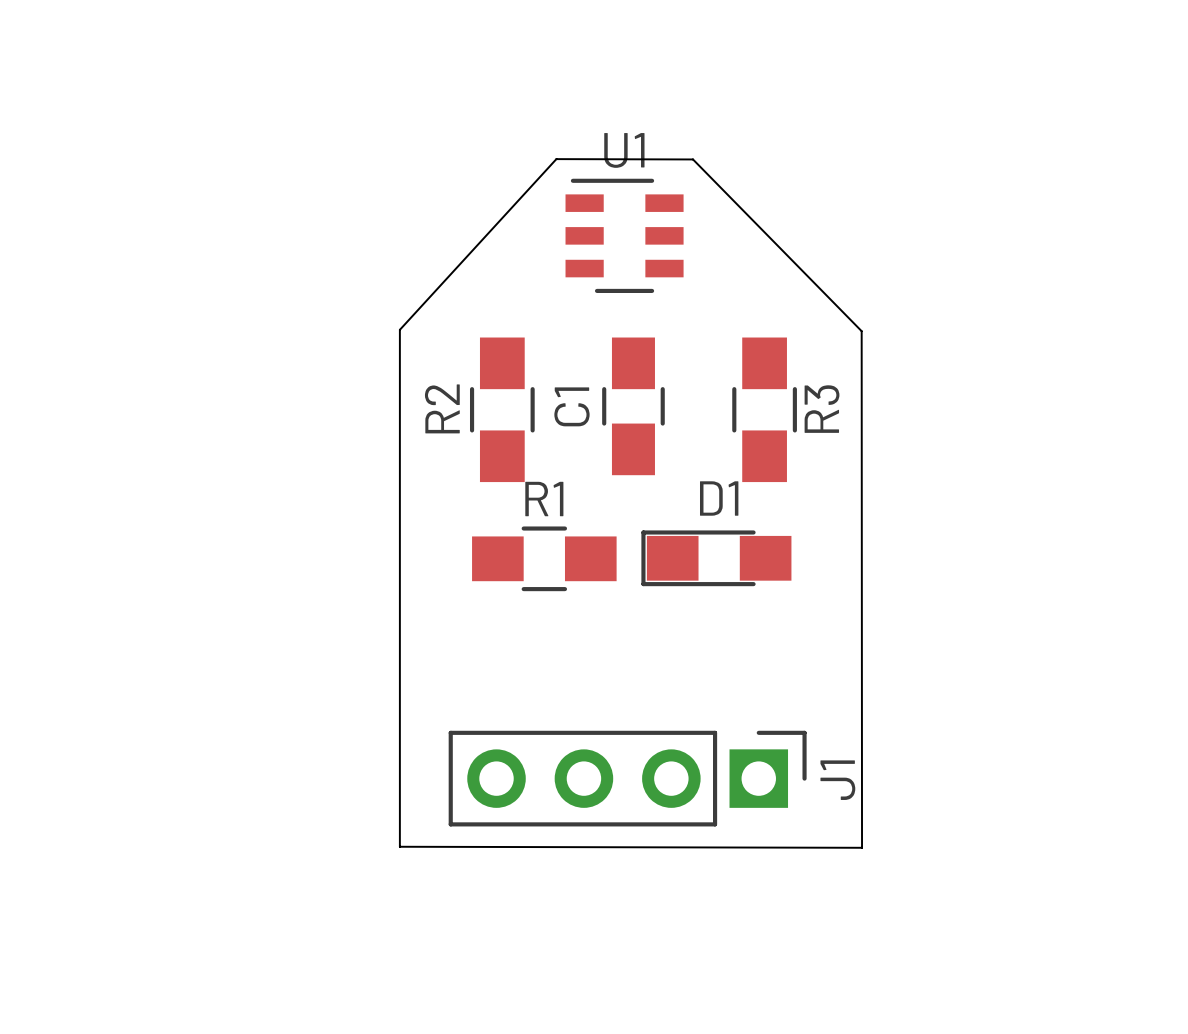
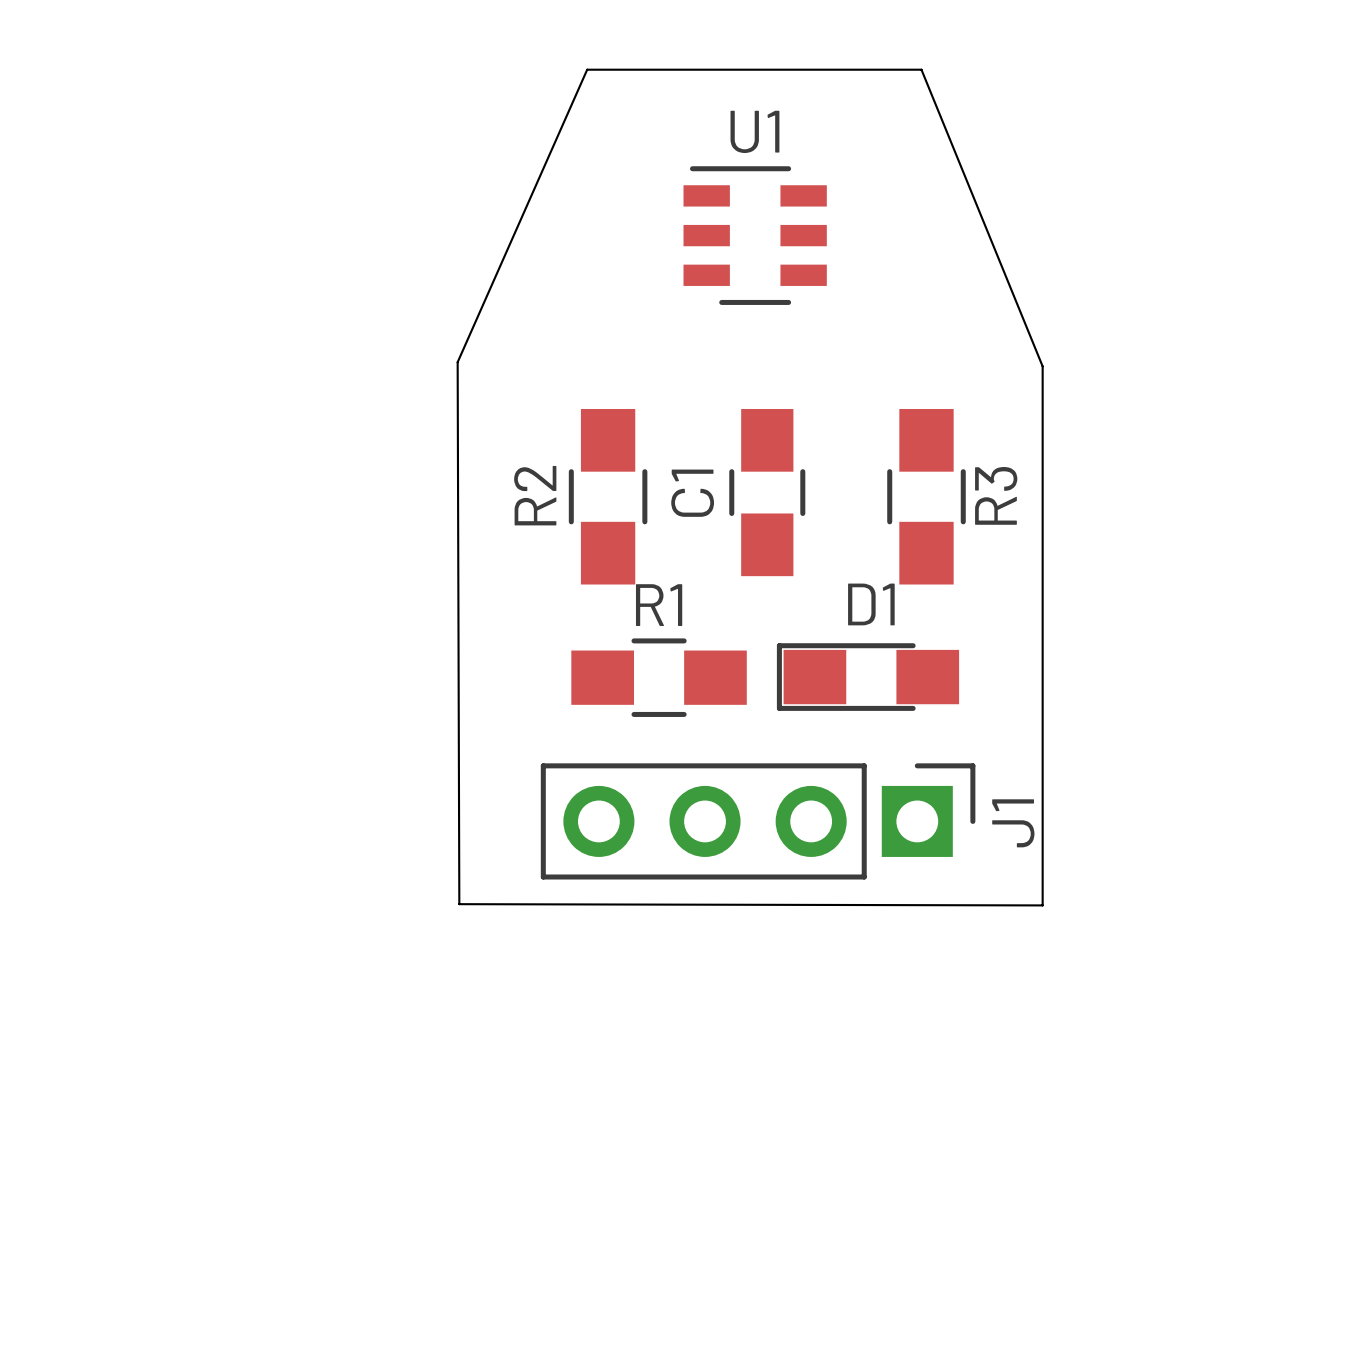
board edge: (556, 159) (399, 329) (399, 846) (862, 847) (861, 331) (693, 159) (556, 159) -> (587, 69) (457, 362) (459, 904) (1042, 905) (1042, 366) (921, 69) (587, 69)
U1 position: (624, 235) -> (755, 235)
J1 position: (627, 778) -> (758, 821)

